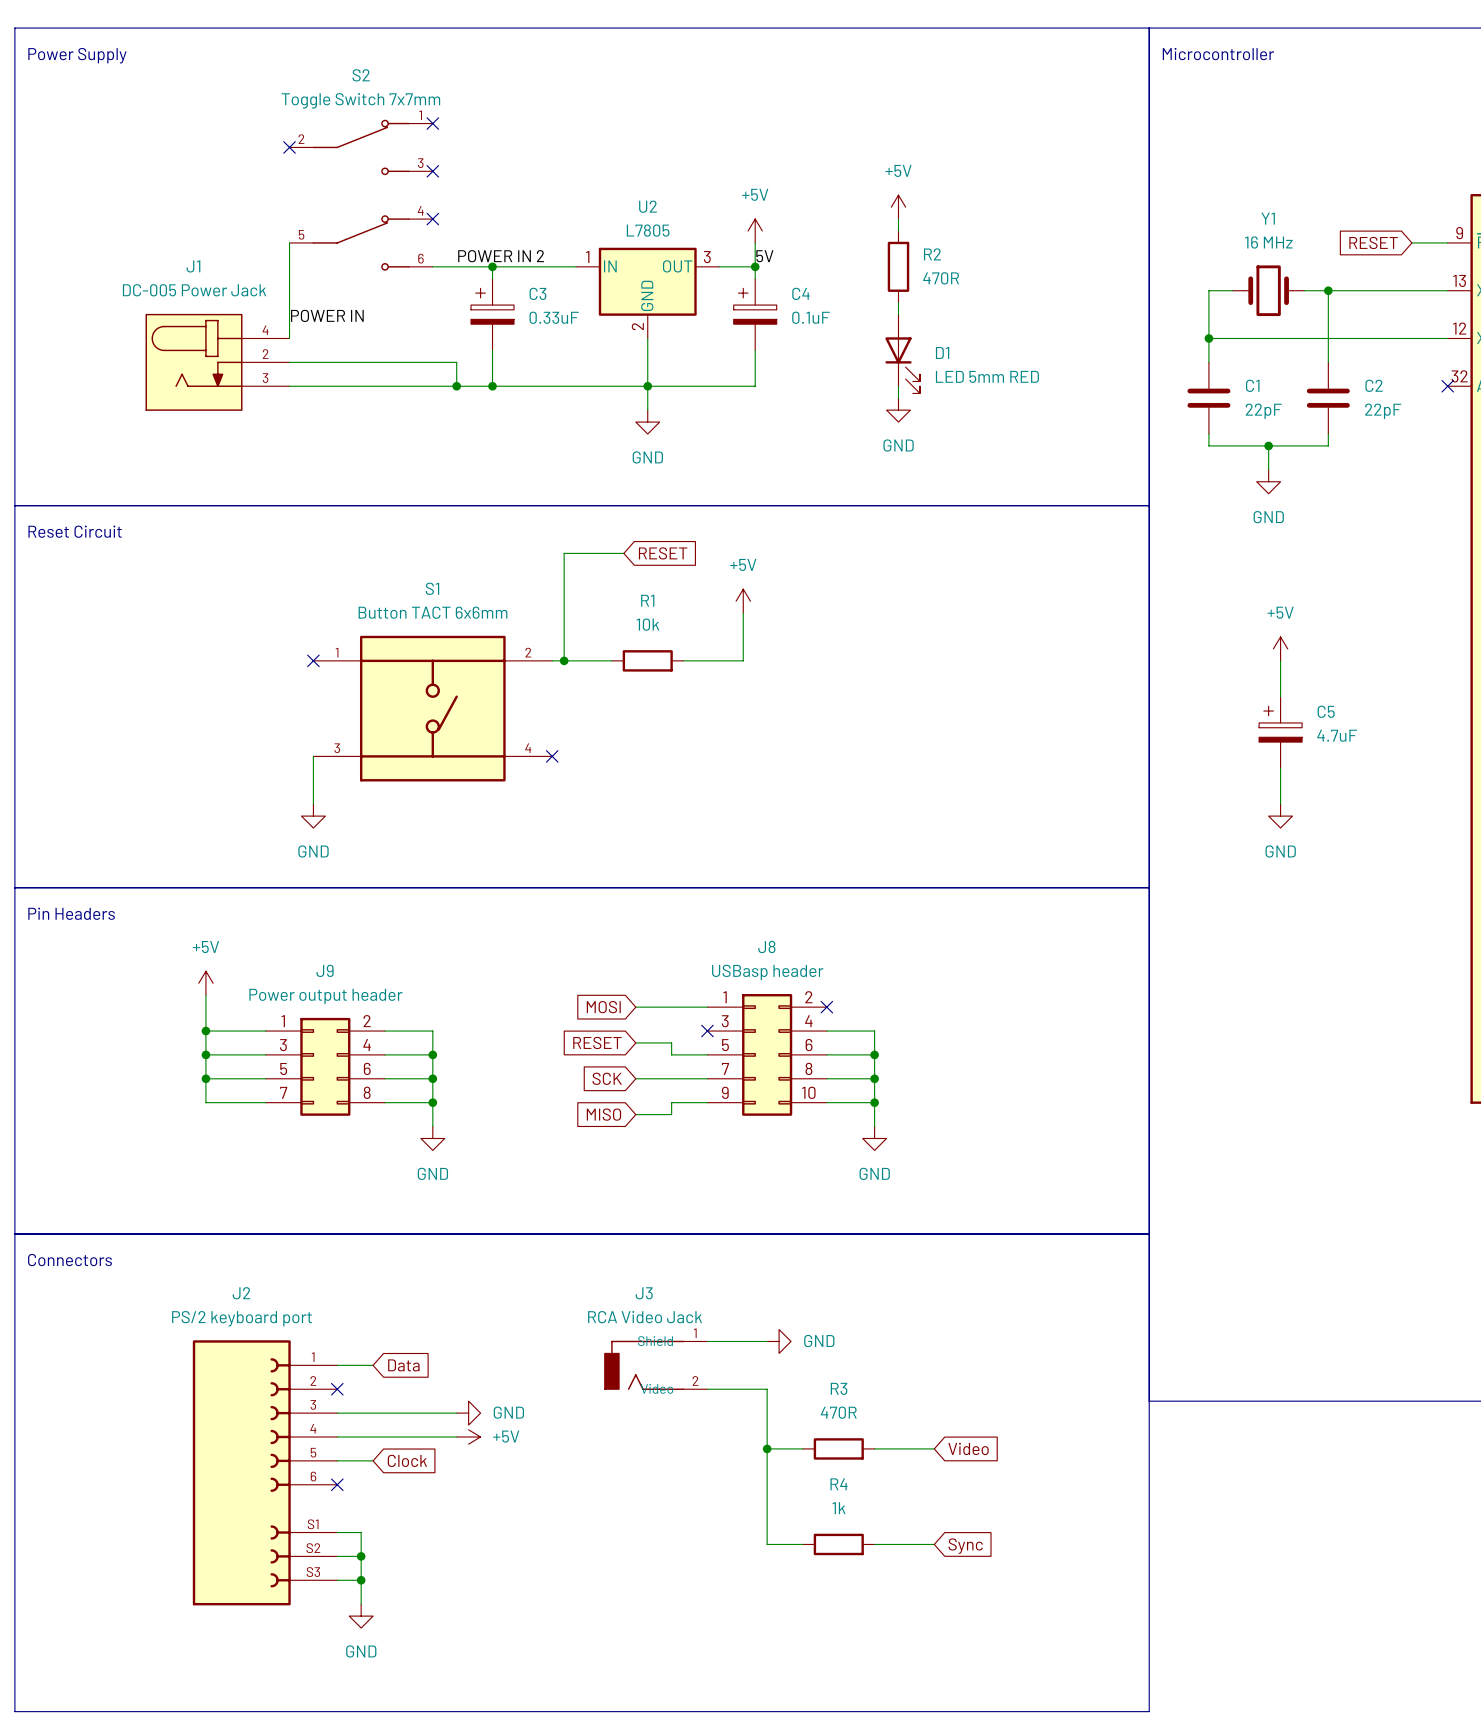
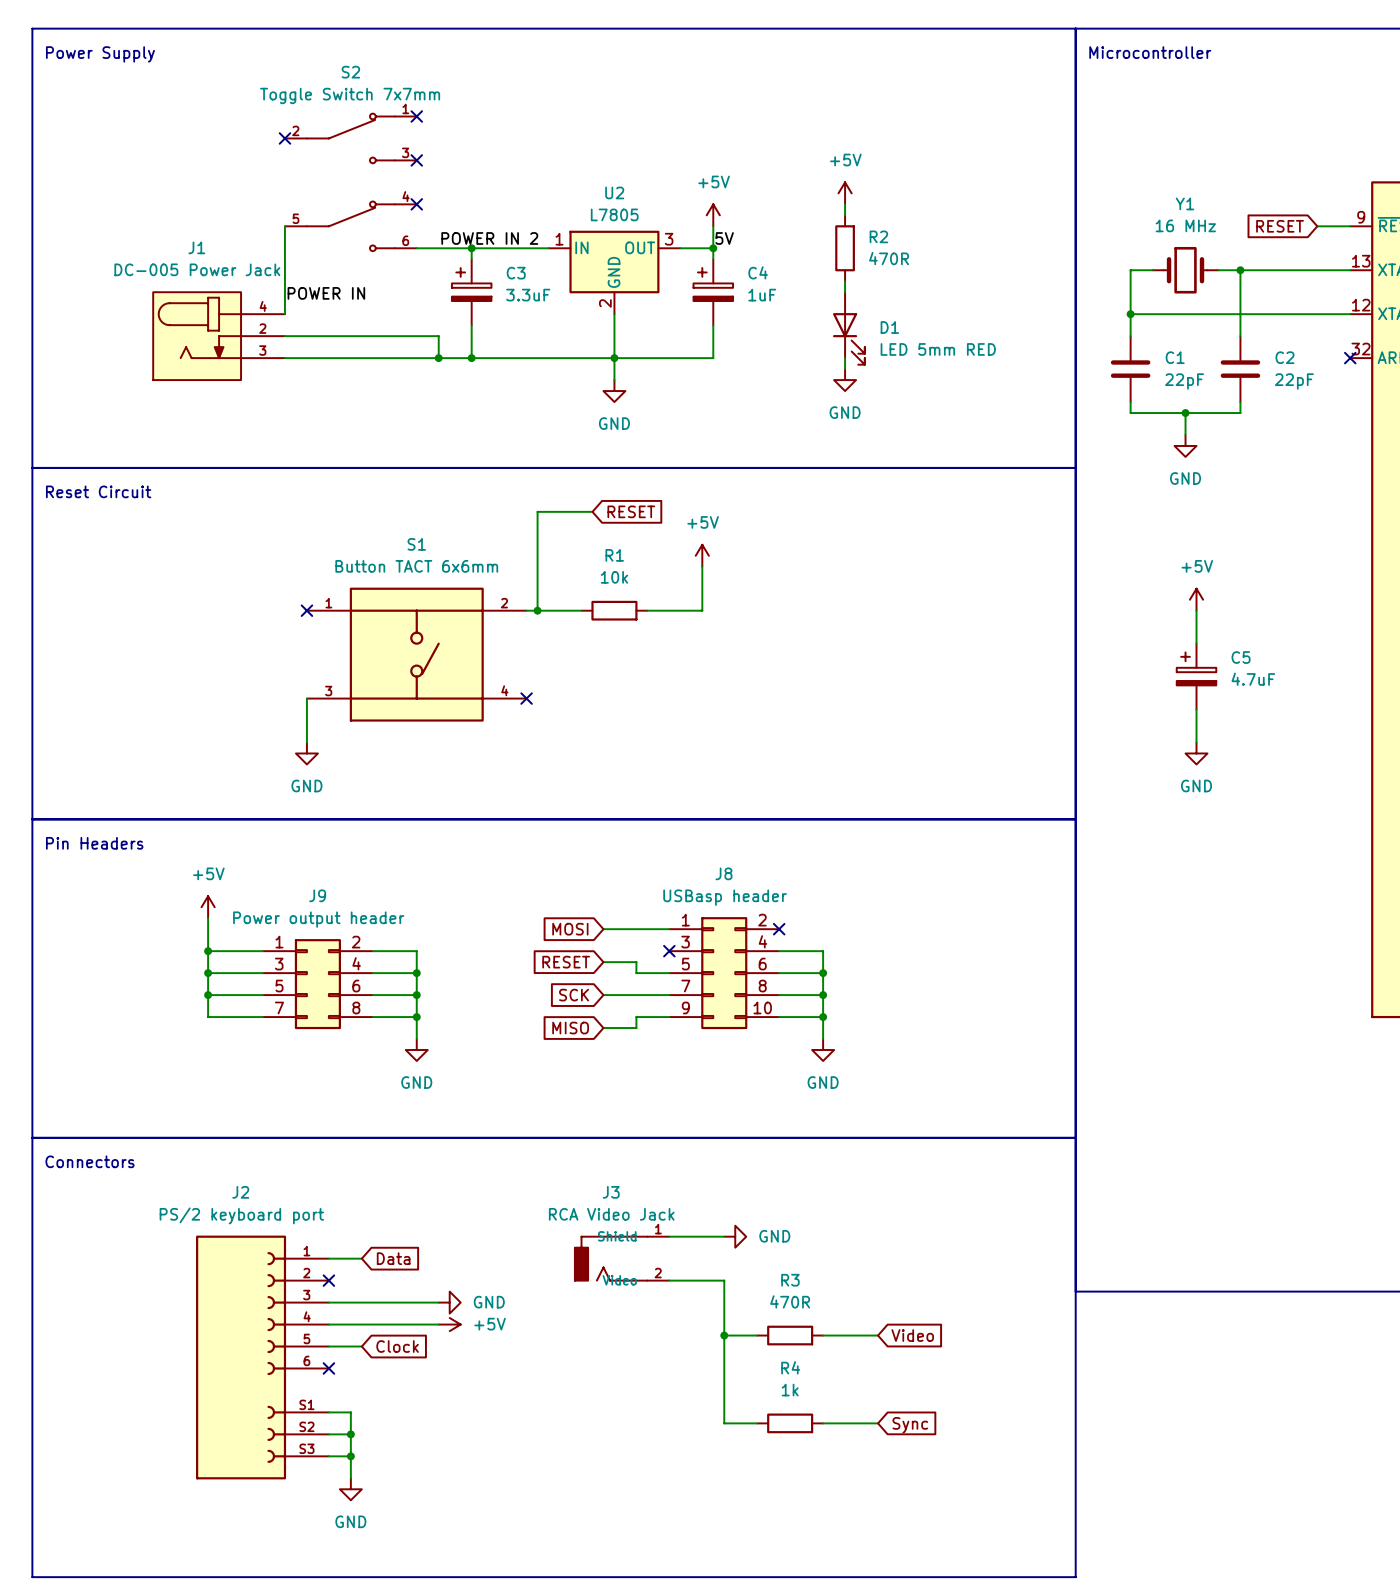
C3 value: 0.33uF (554, 317) -> 3.3uF (528, 295)
C4 value: 0.1uF (811, 317) -> 1uF (762, 295)

